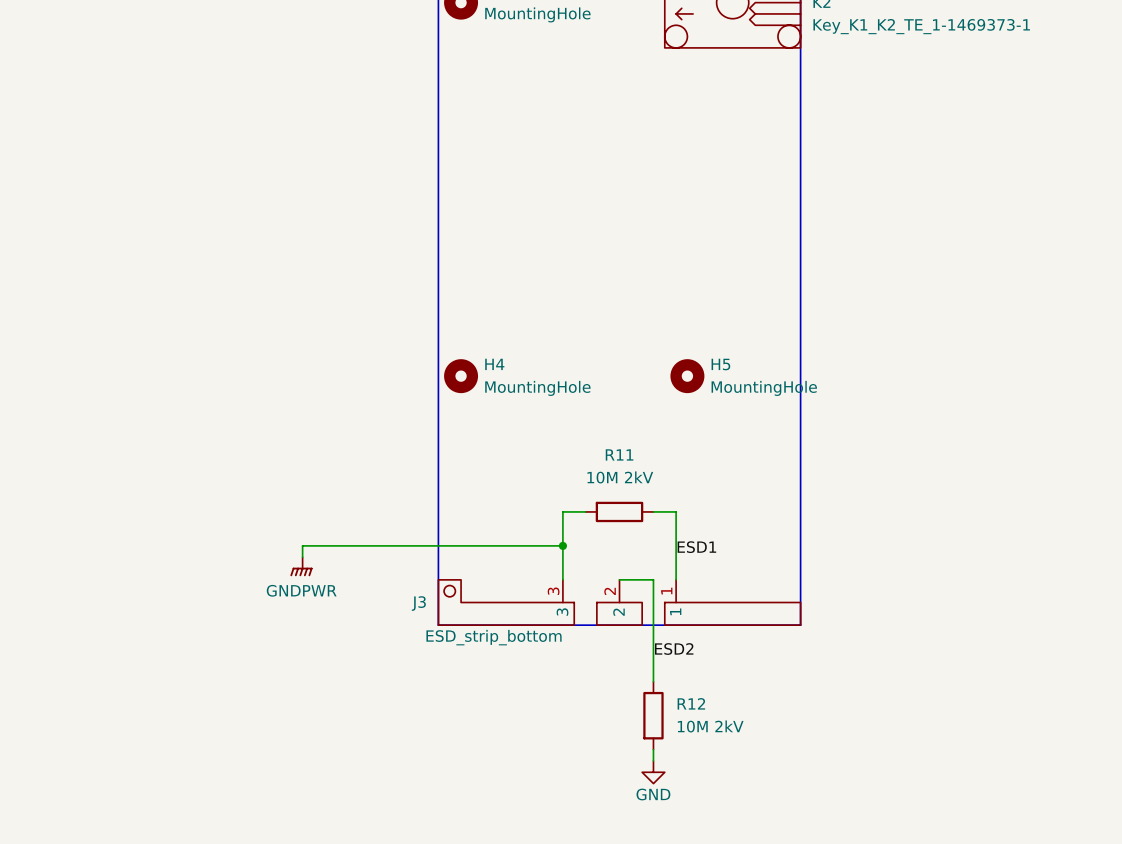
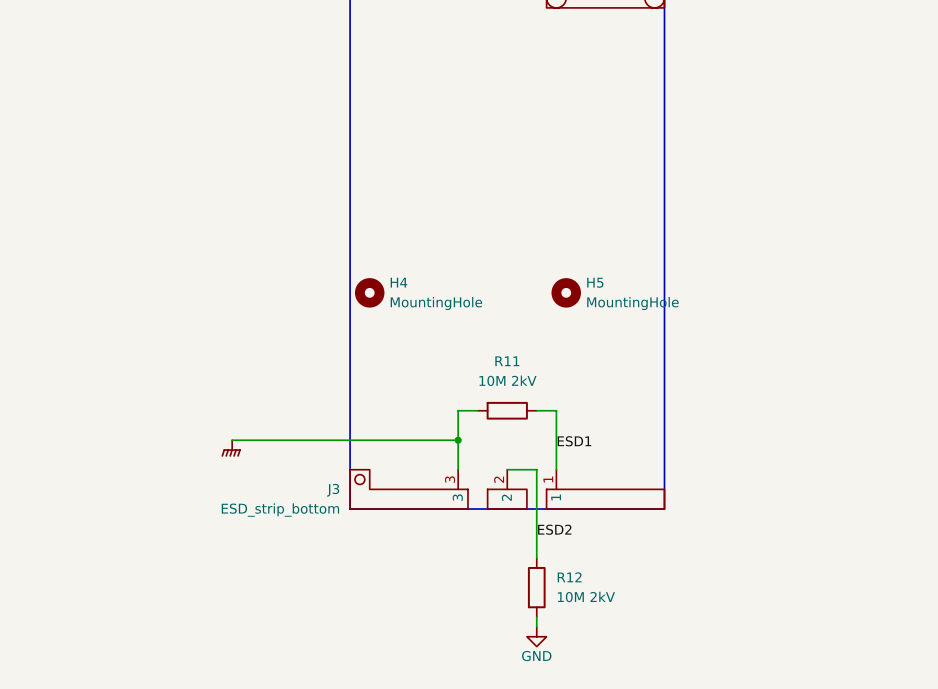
power symbol: none -> (231, 448)
power symbol: GNDPWR (301, 566) -> none
J3 value position: ESD_strip_bottom (494, 637) -> ESD_strip_bottom (280, 510)

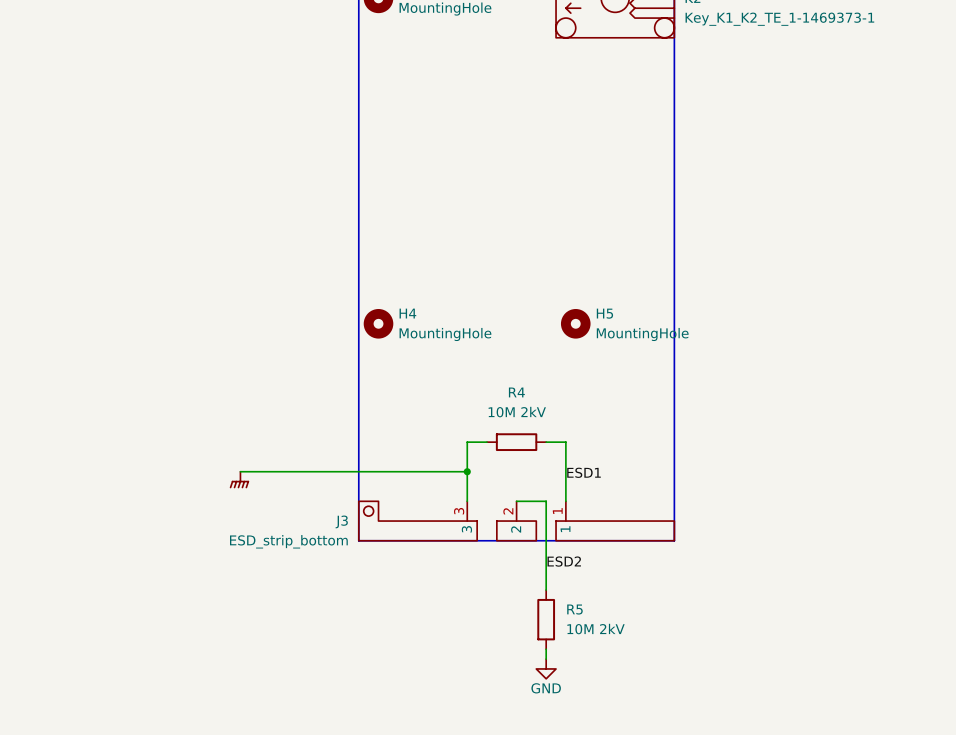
R11 name: R11 (507, 361) -> R4 (516, 392)
R12 name: R12 (569, 577) -> R5 (574, 609)

